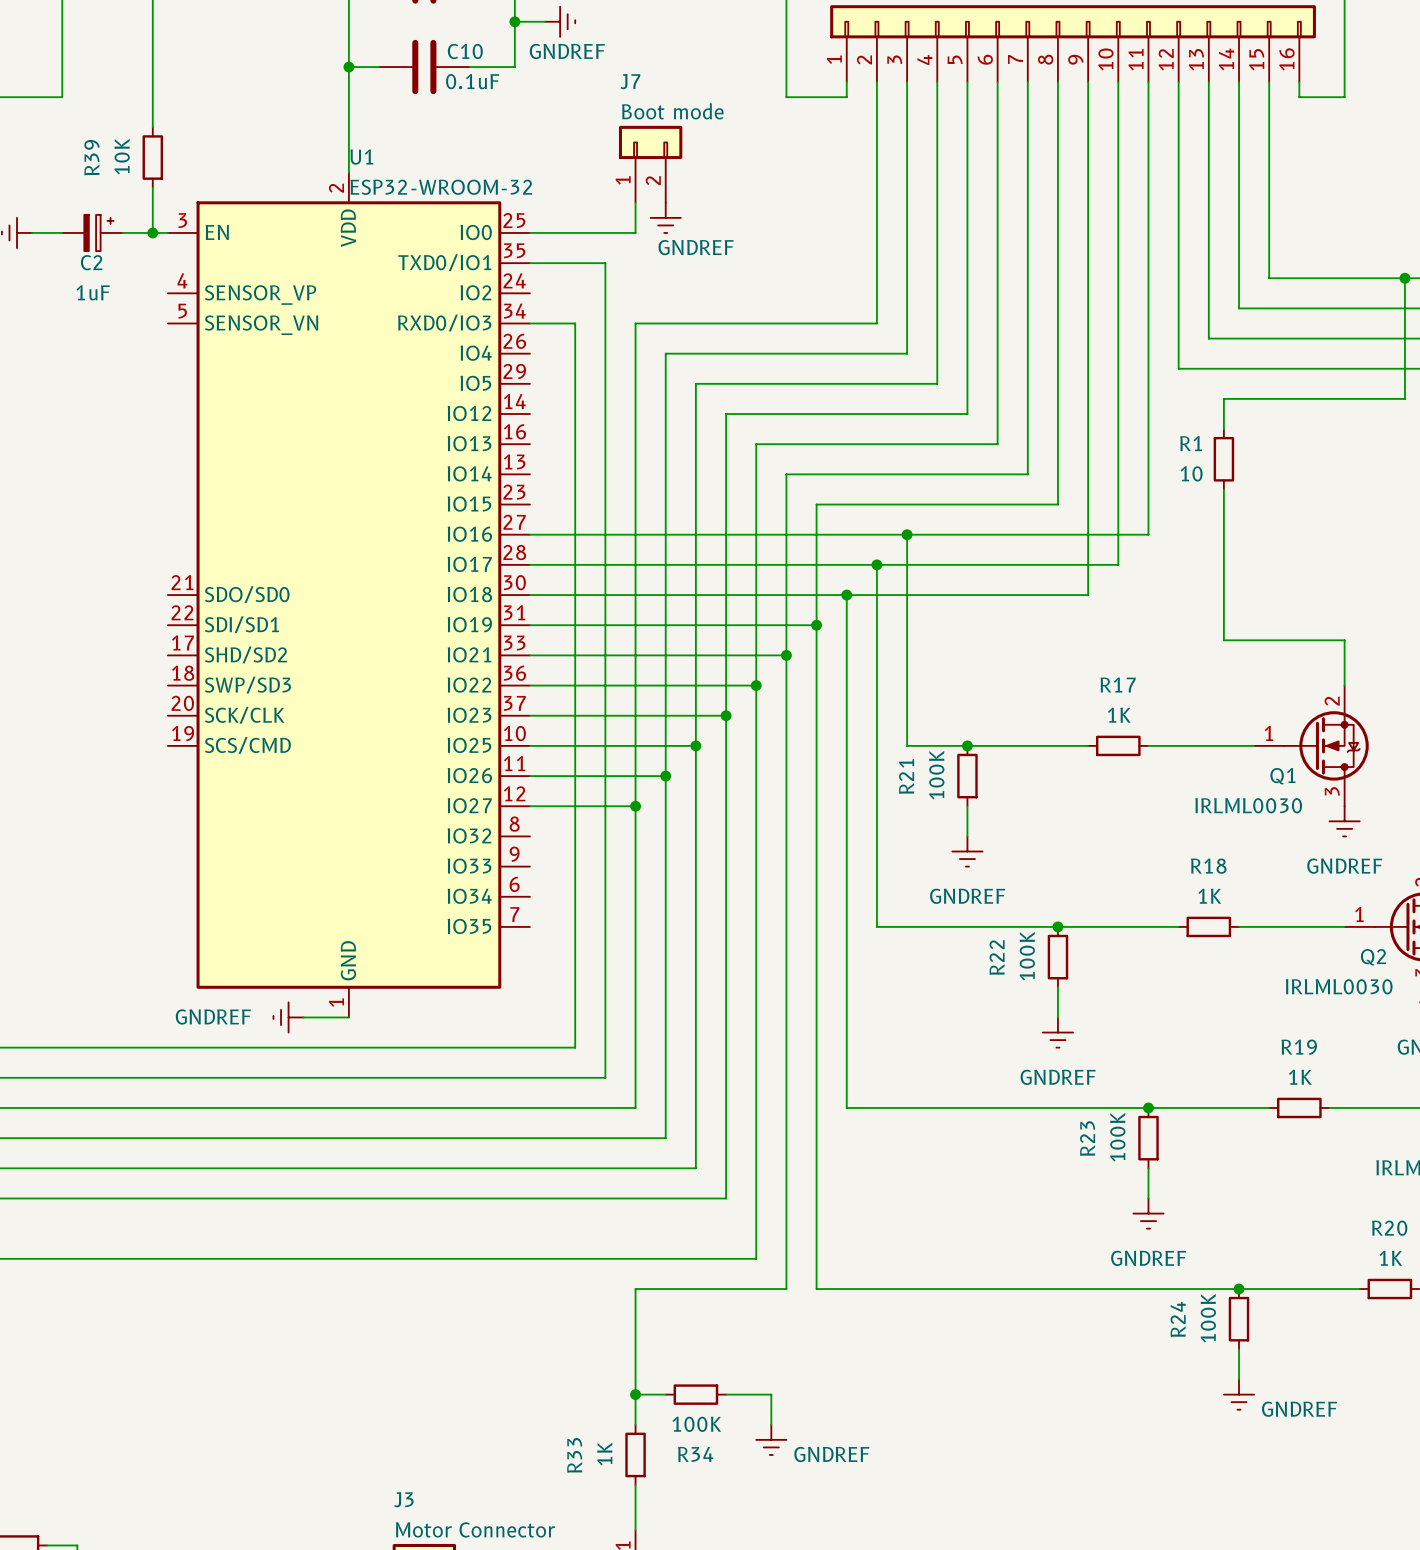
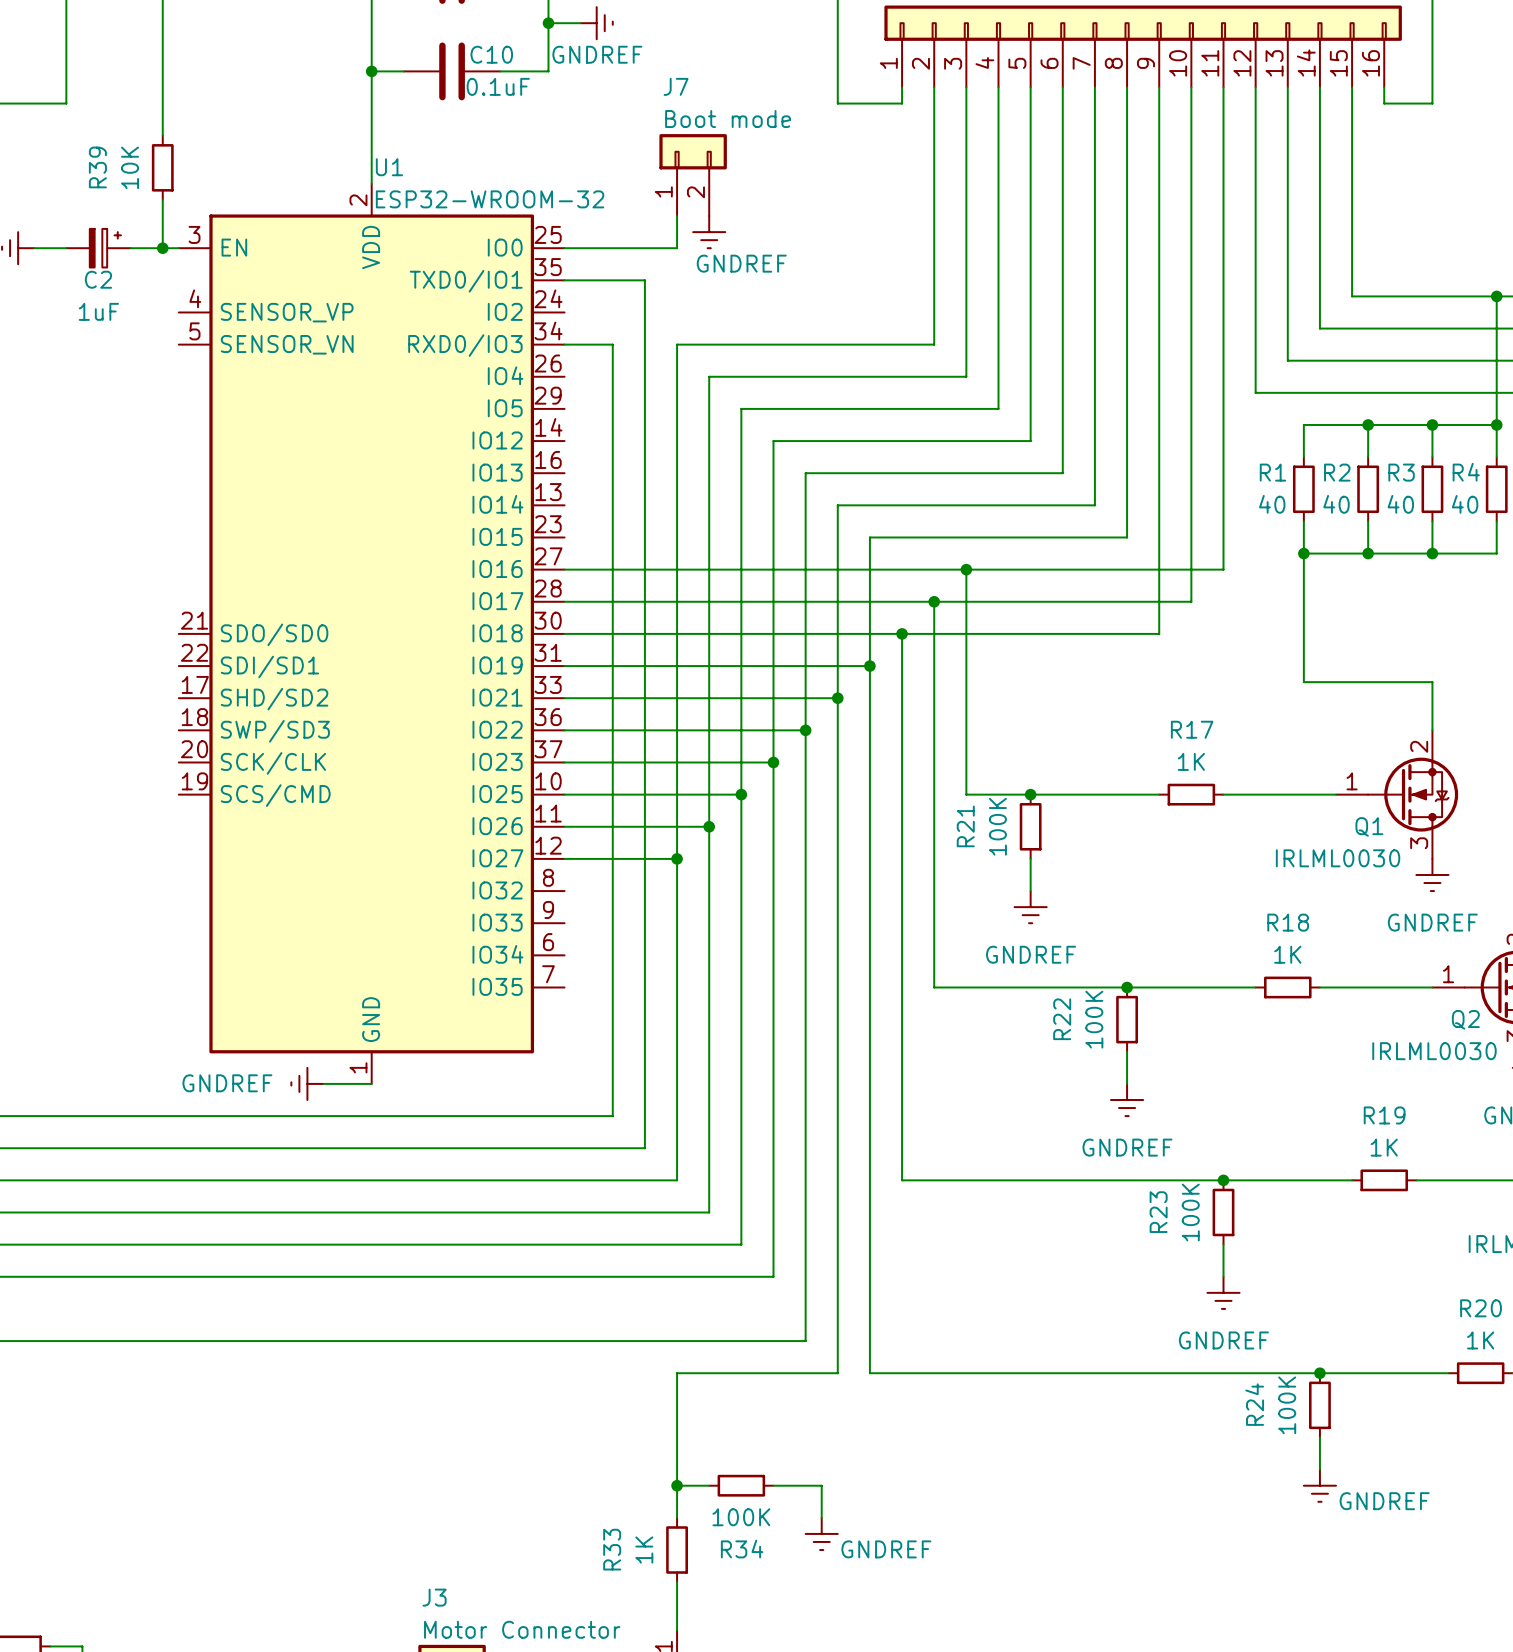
wire: none -> (1368, 424) (1368, 457)
junction: none -> (1368, 424)
wire: none -> (1432, 424) (1432, 457)
junction: none -> (1432, 424)
wire: none -> (1496, 424) (1496, 457)
junction: none -> (1496, 424)
R2: none -> 40 (1368, 489)
R3: none -> 40 (1432, 489)
R4: none -> 40 (1496, 489)
R1 value: 10 (1191, 473) -> 40 (1272, 504)
wire: none -> (1368, 521) (1368, 553)
wire: none -> (1432, 521) (1432, 553)
wire: none -> (1496, 521) (1496, 553) (1303, 553)
junction: none -> (1303, 553)
junction: none -> (1368, 553)
junction: none -> (1432, 553)

